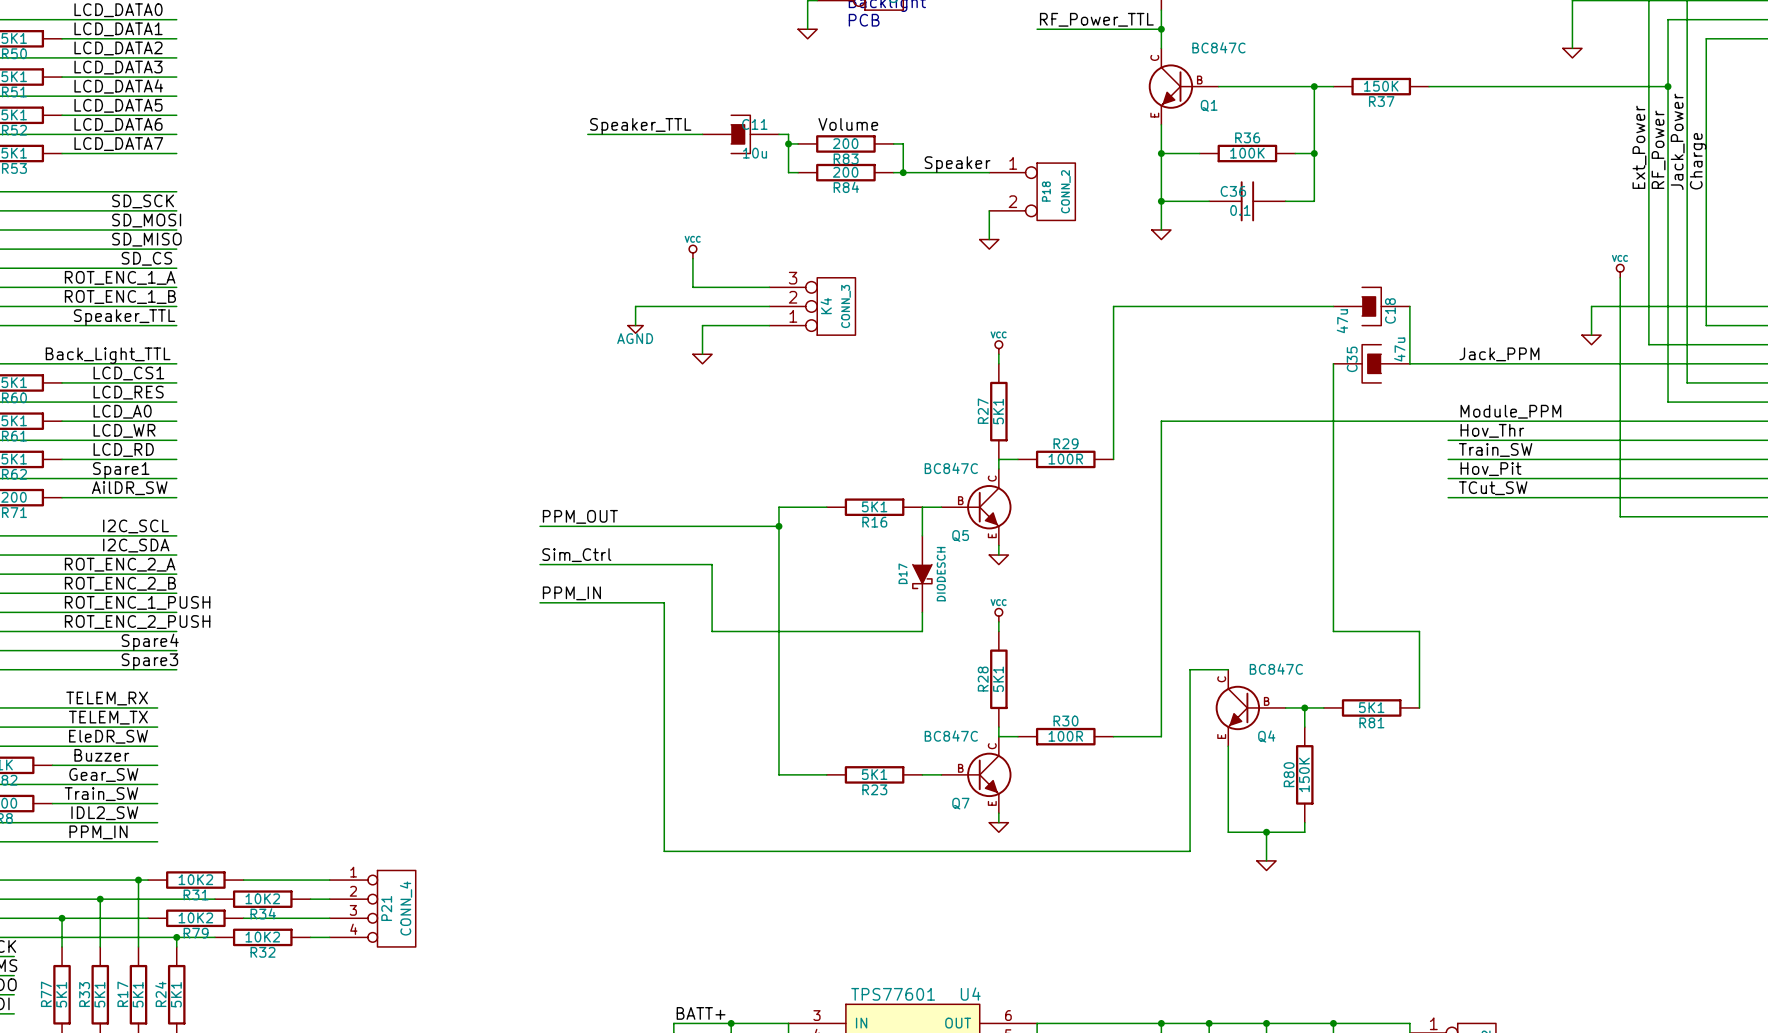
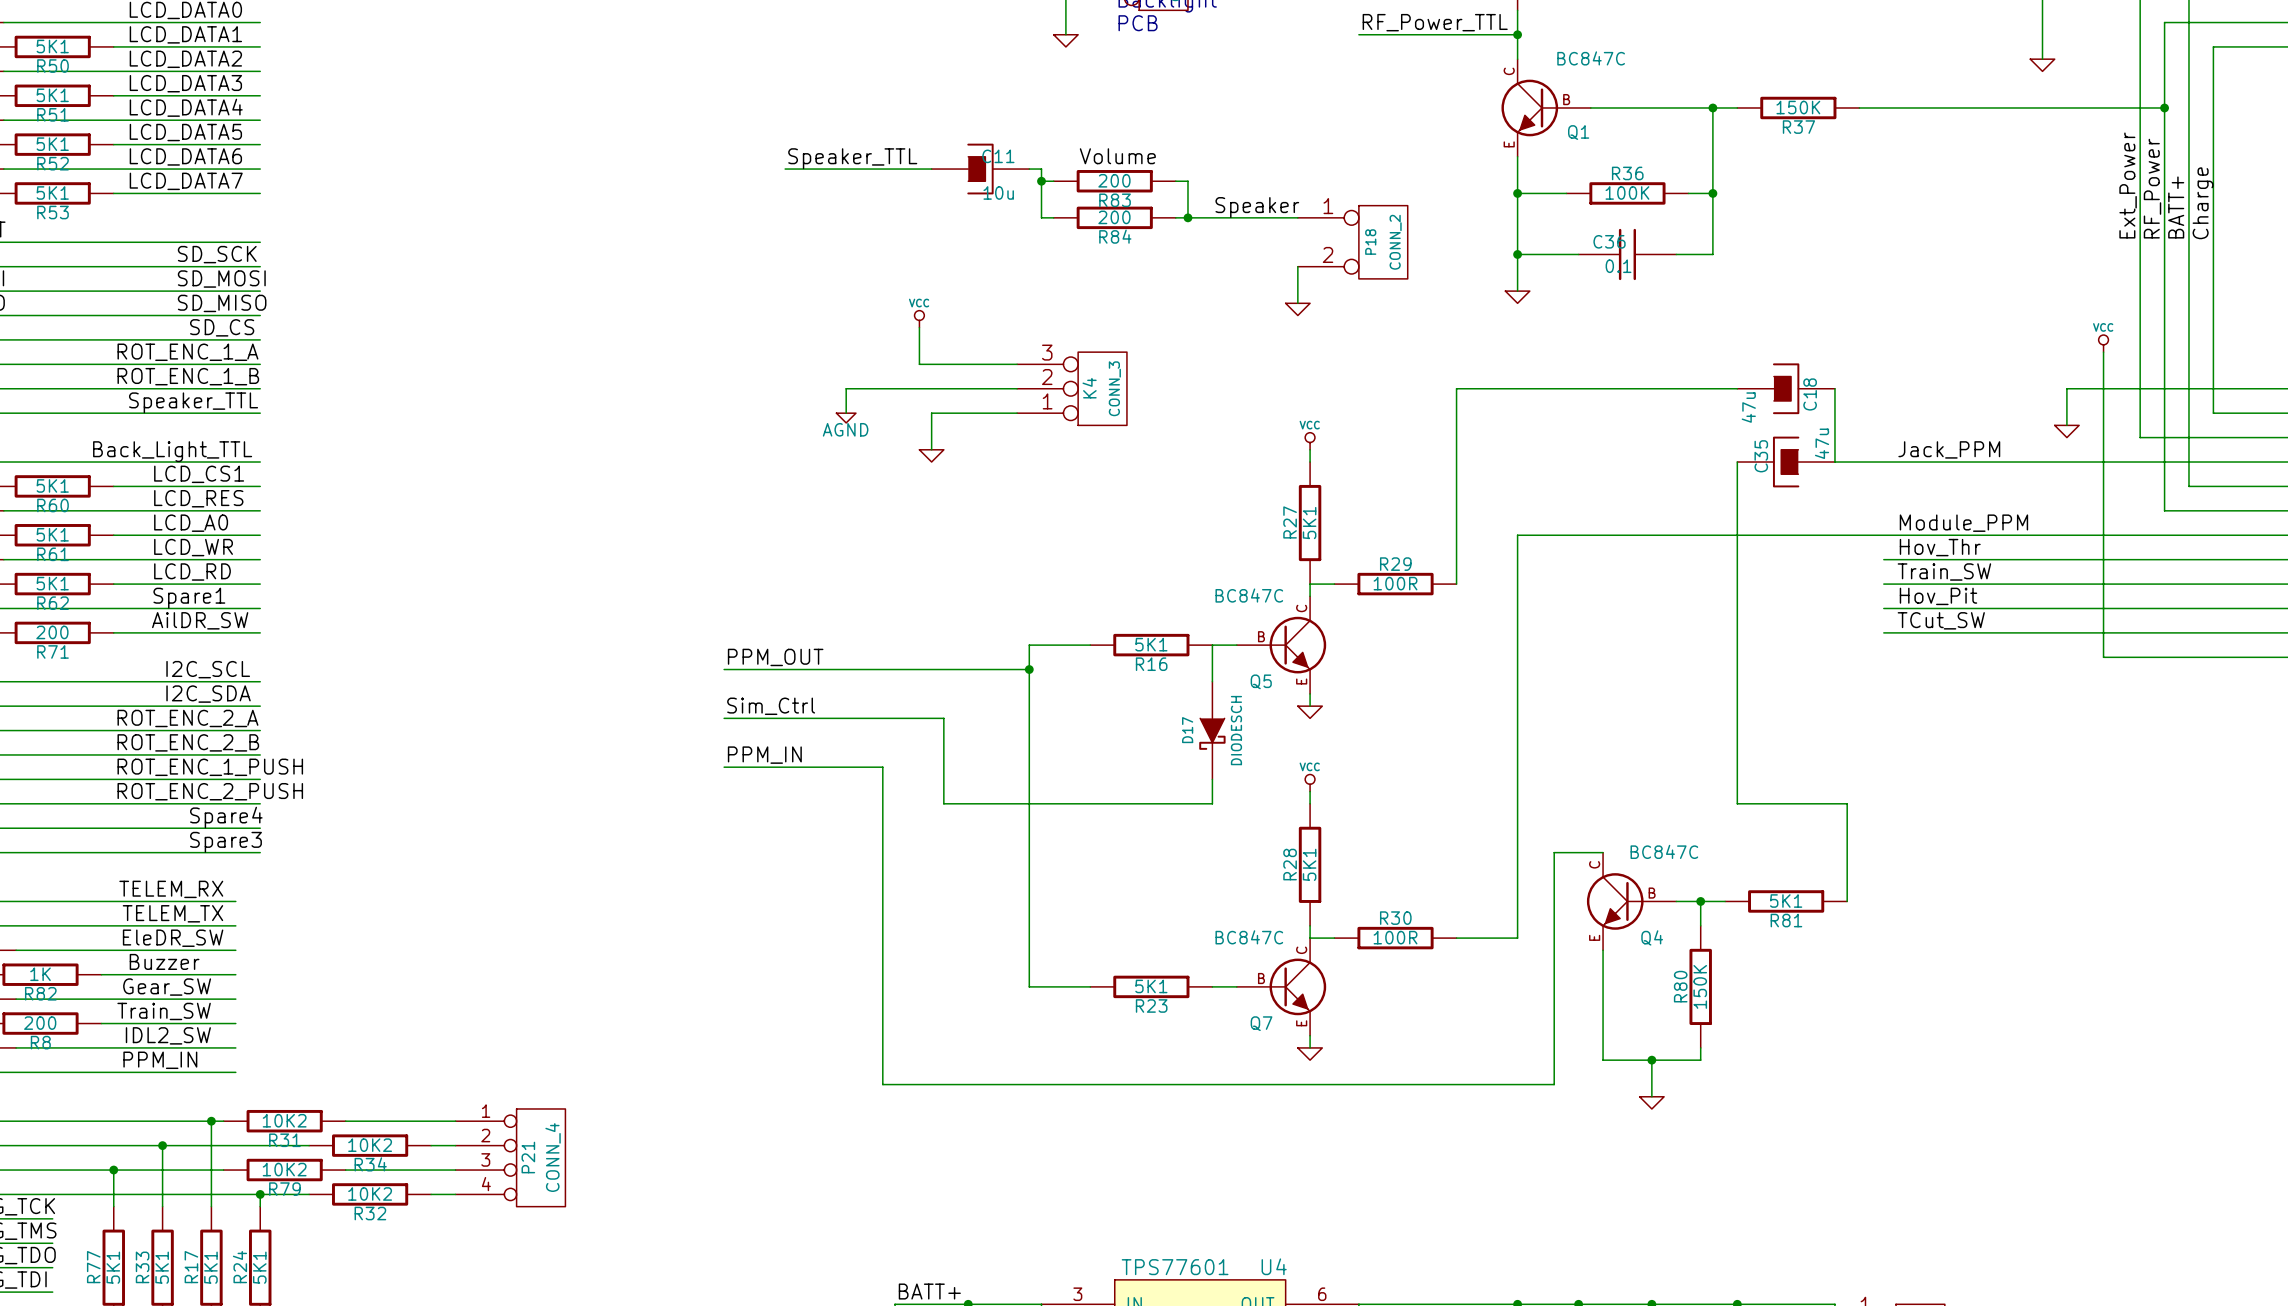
label: Jack_Power (1677, 141) -> BATT+ (2176, 207)

